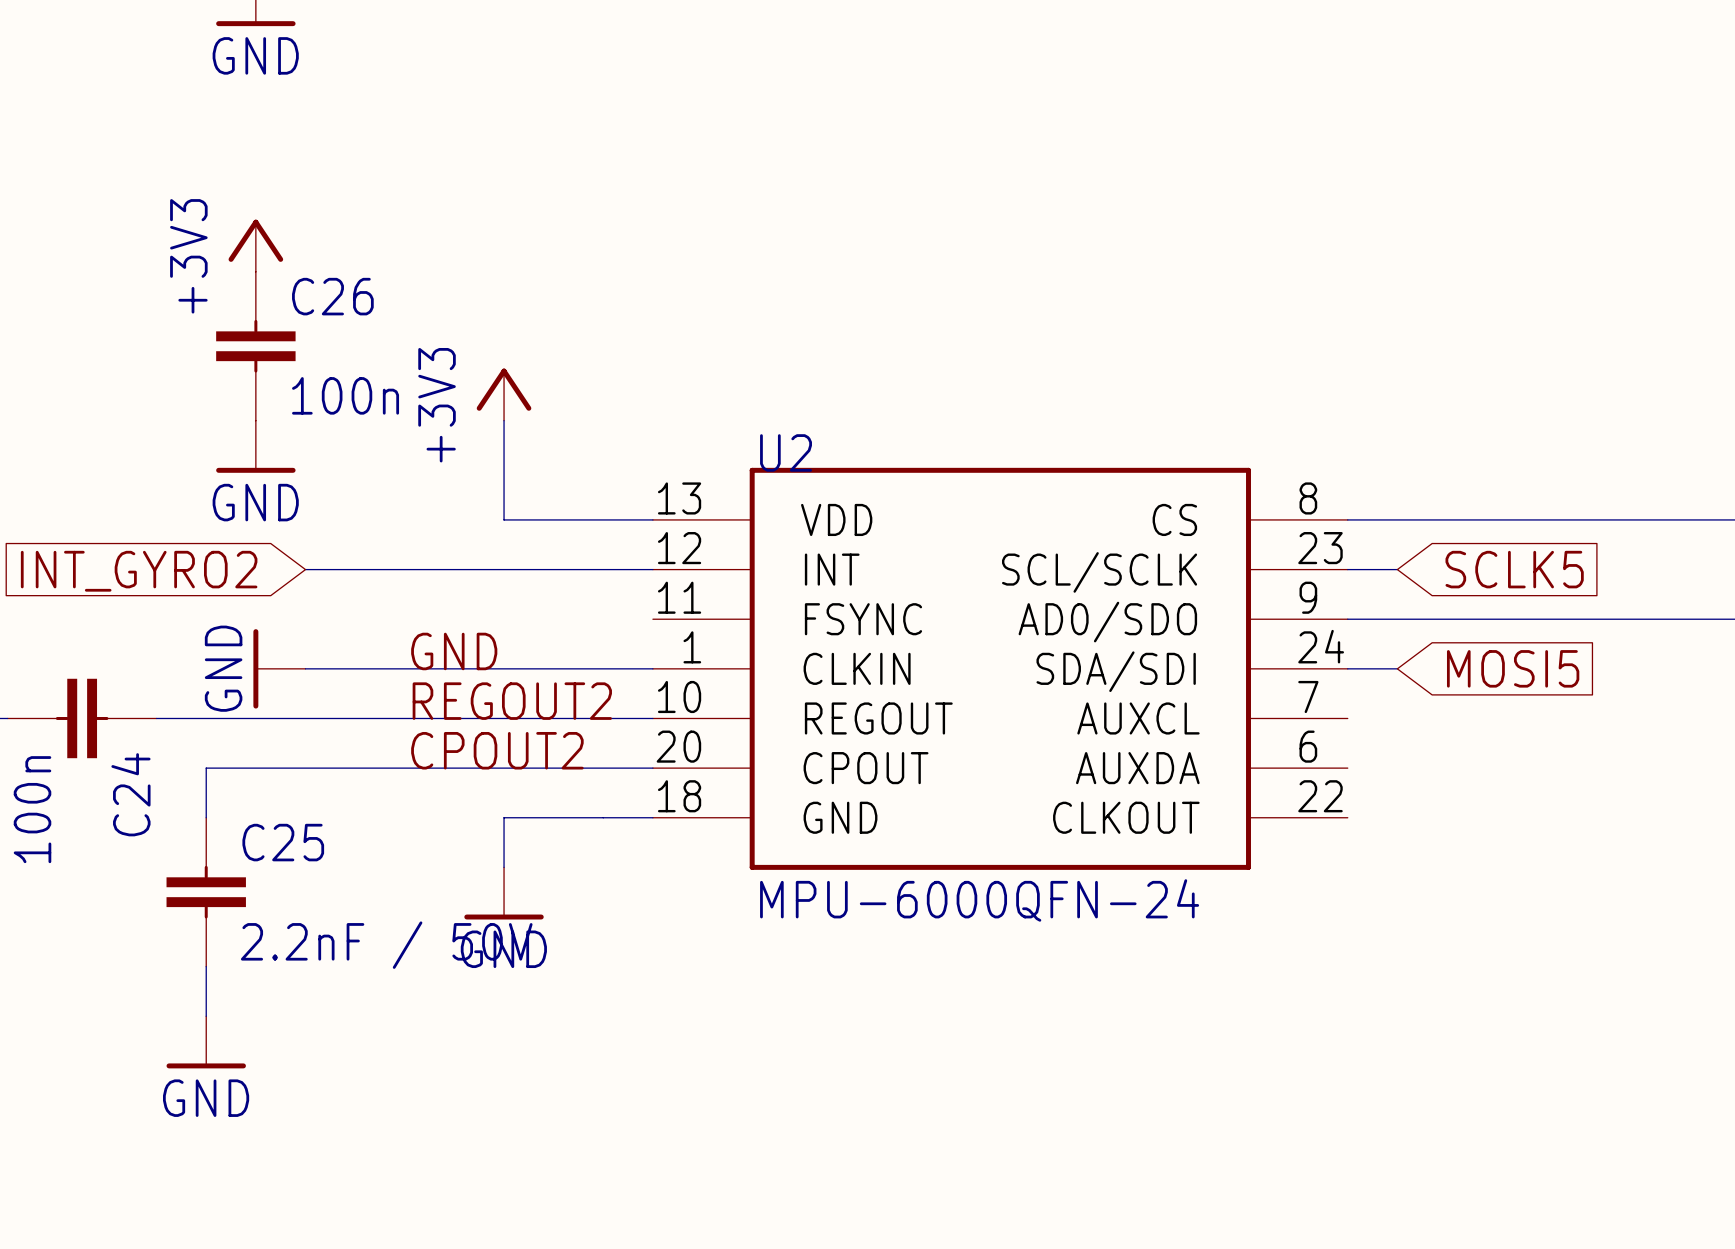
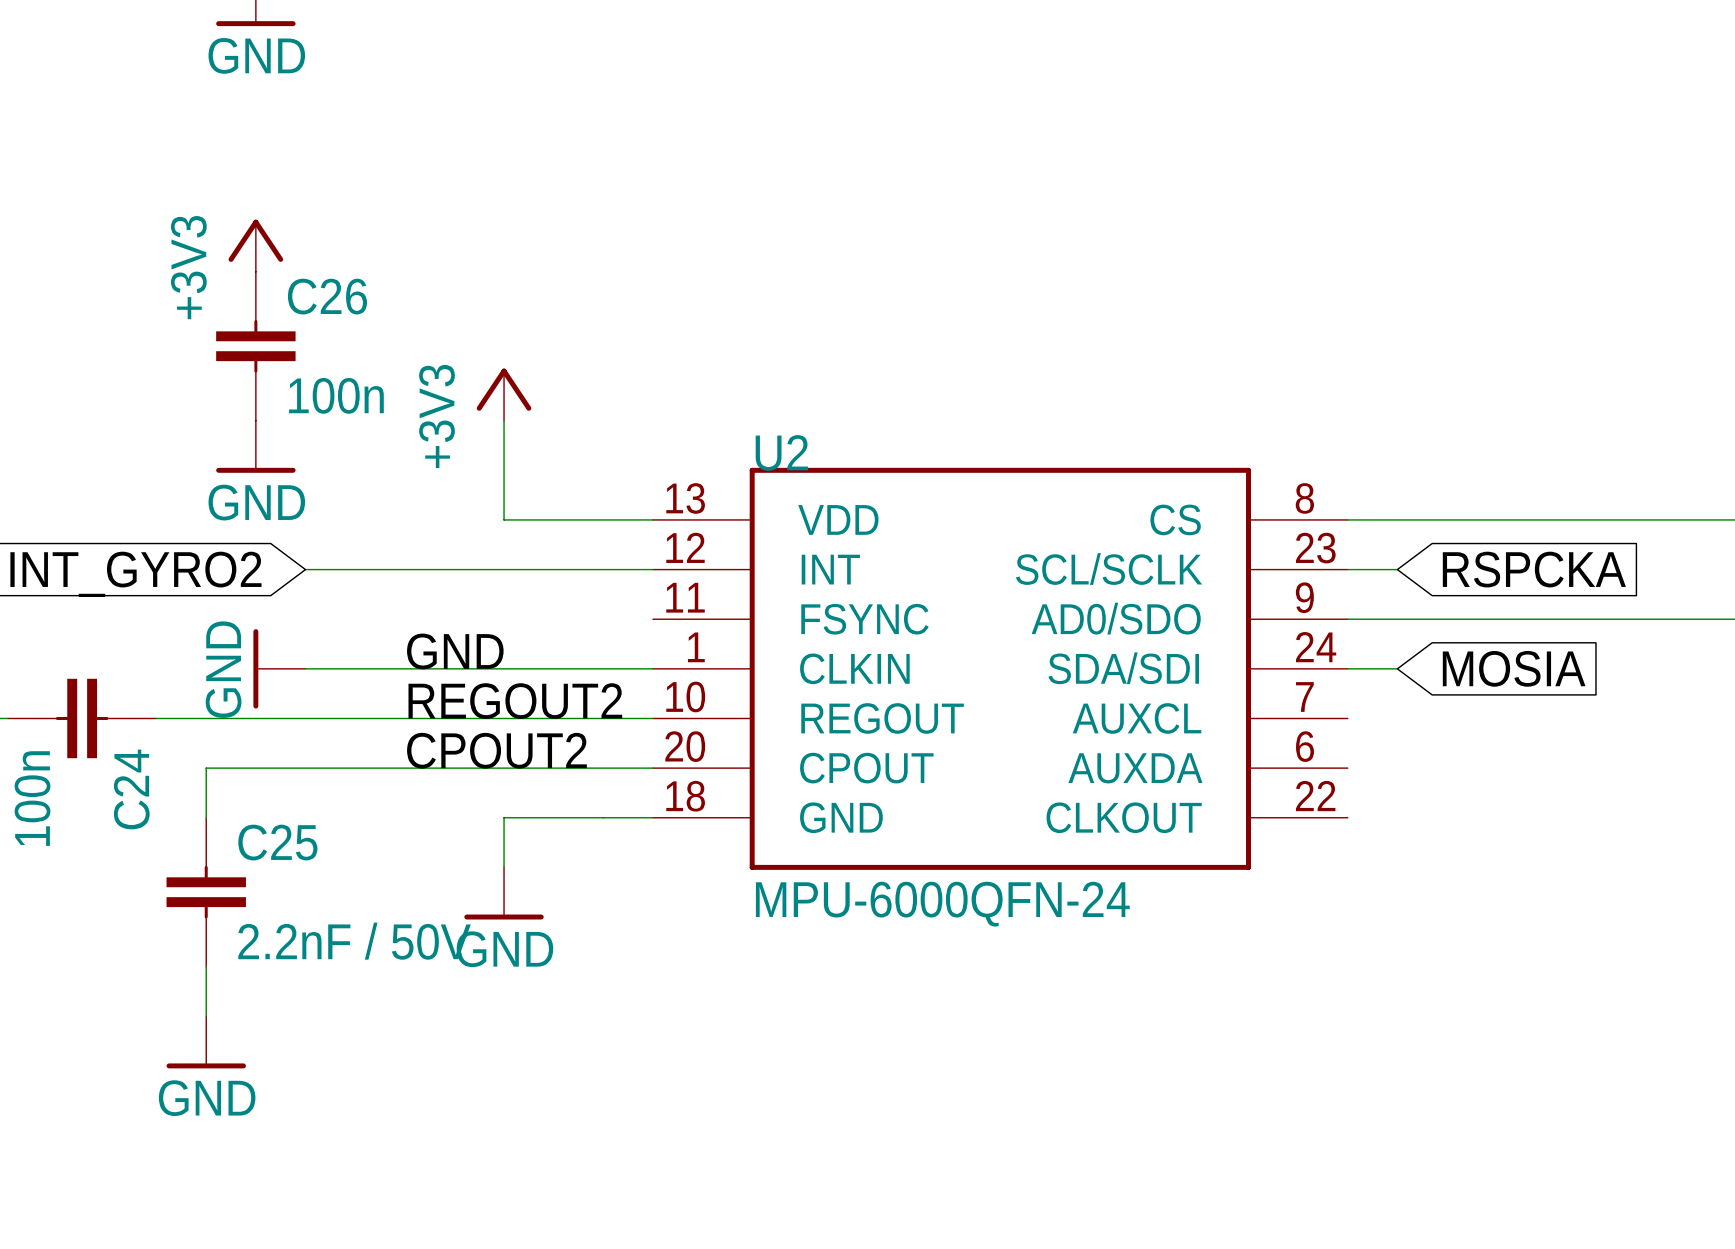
global label: SCLK5 (1514, 569) -> RSPCKA (1534, 569)
global label: MOSI5 (1513, 668) -> MOSIA (1514, 668)

